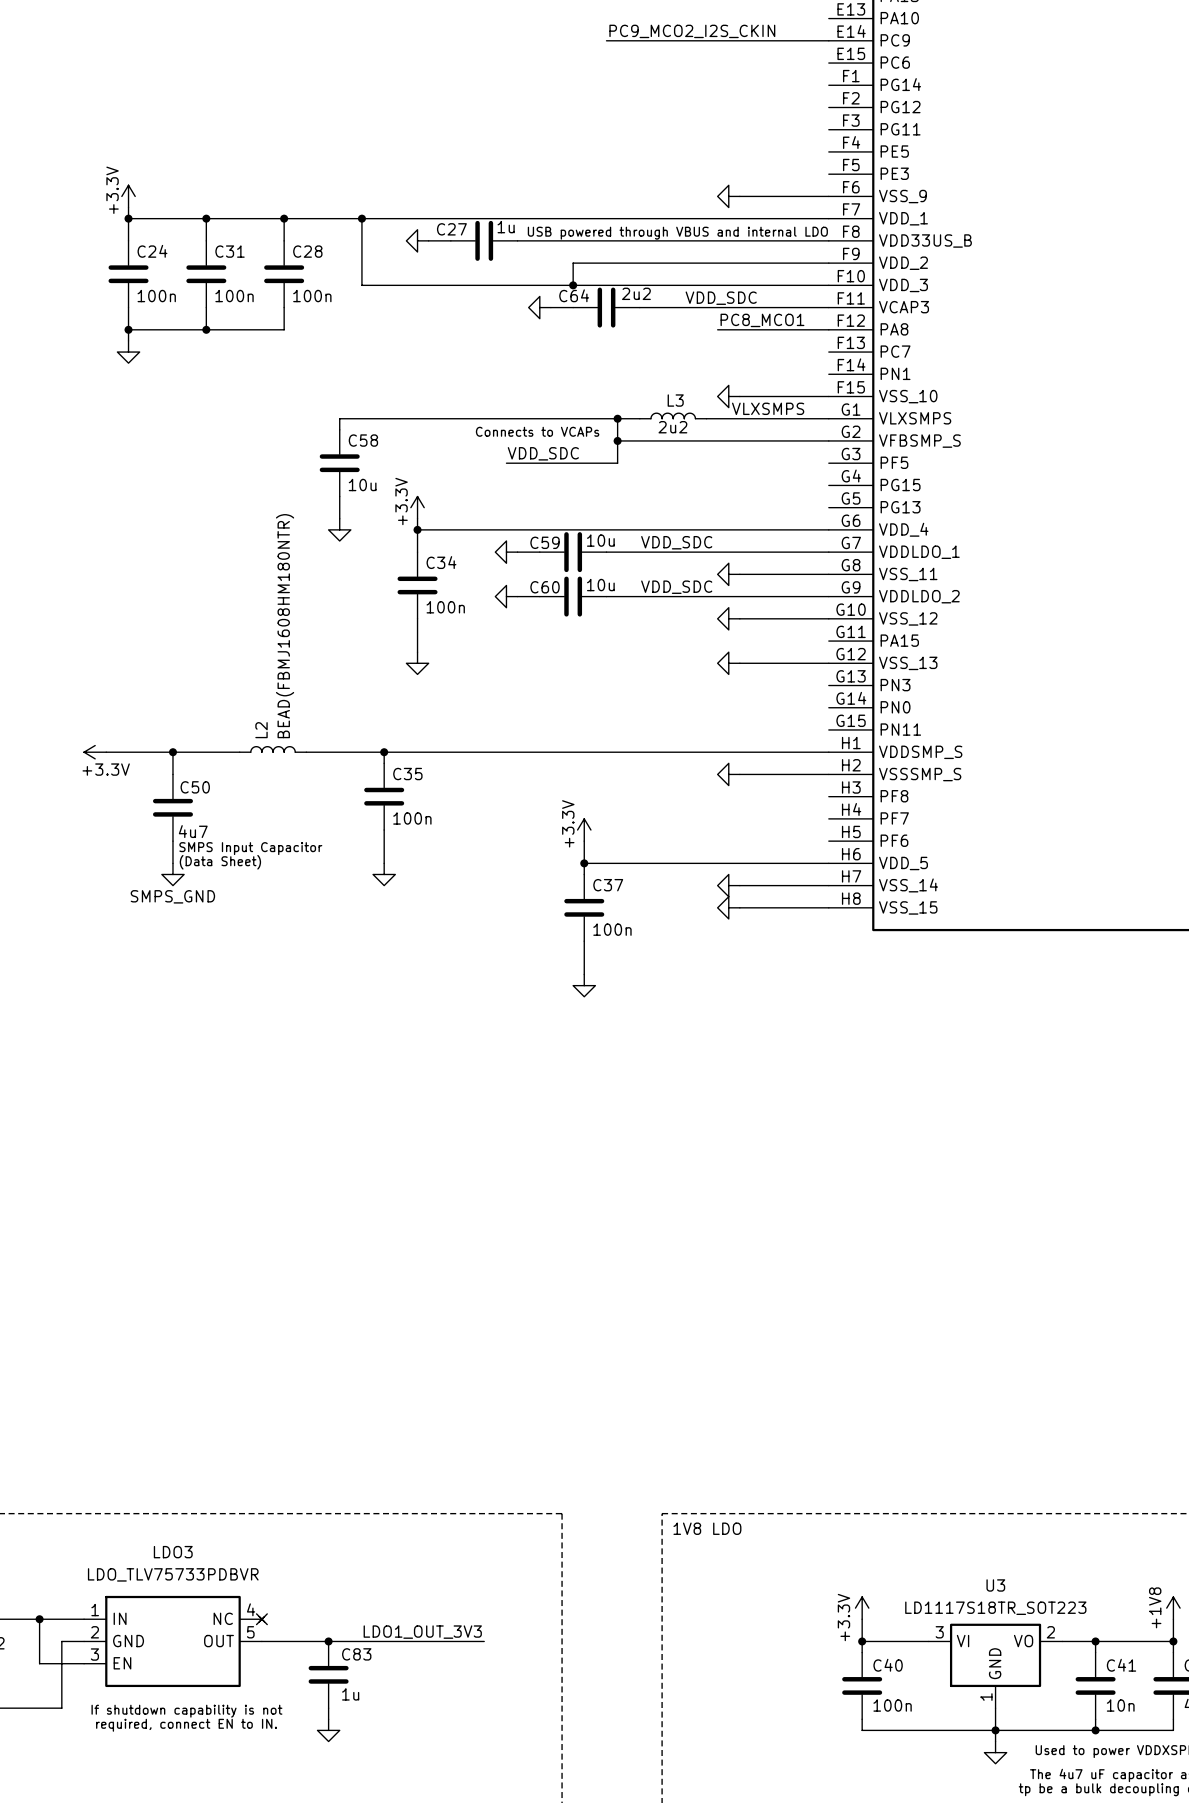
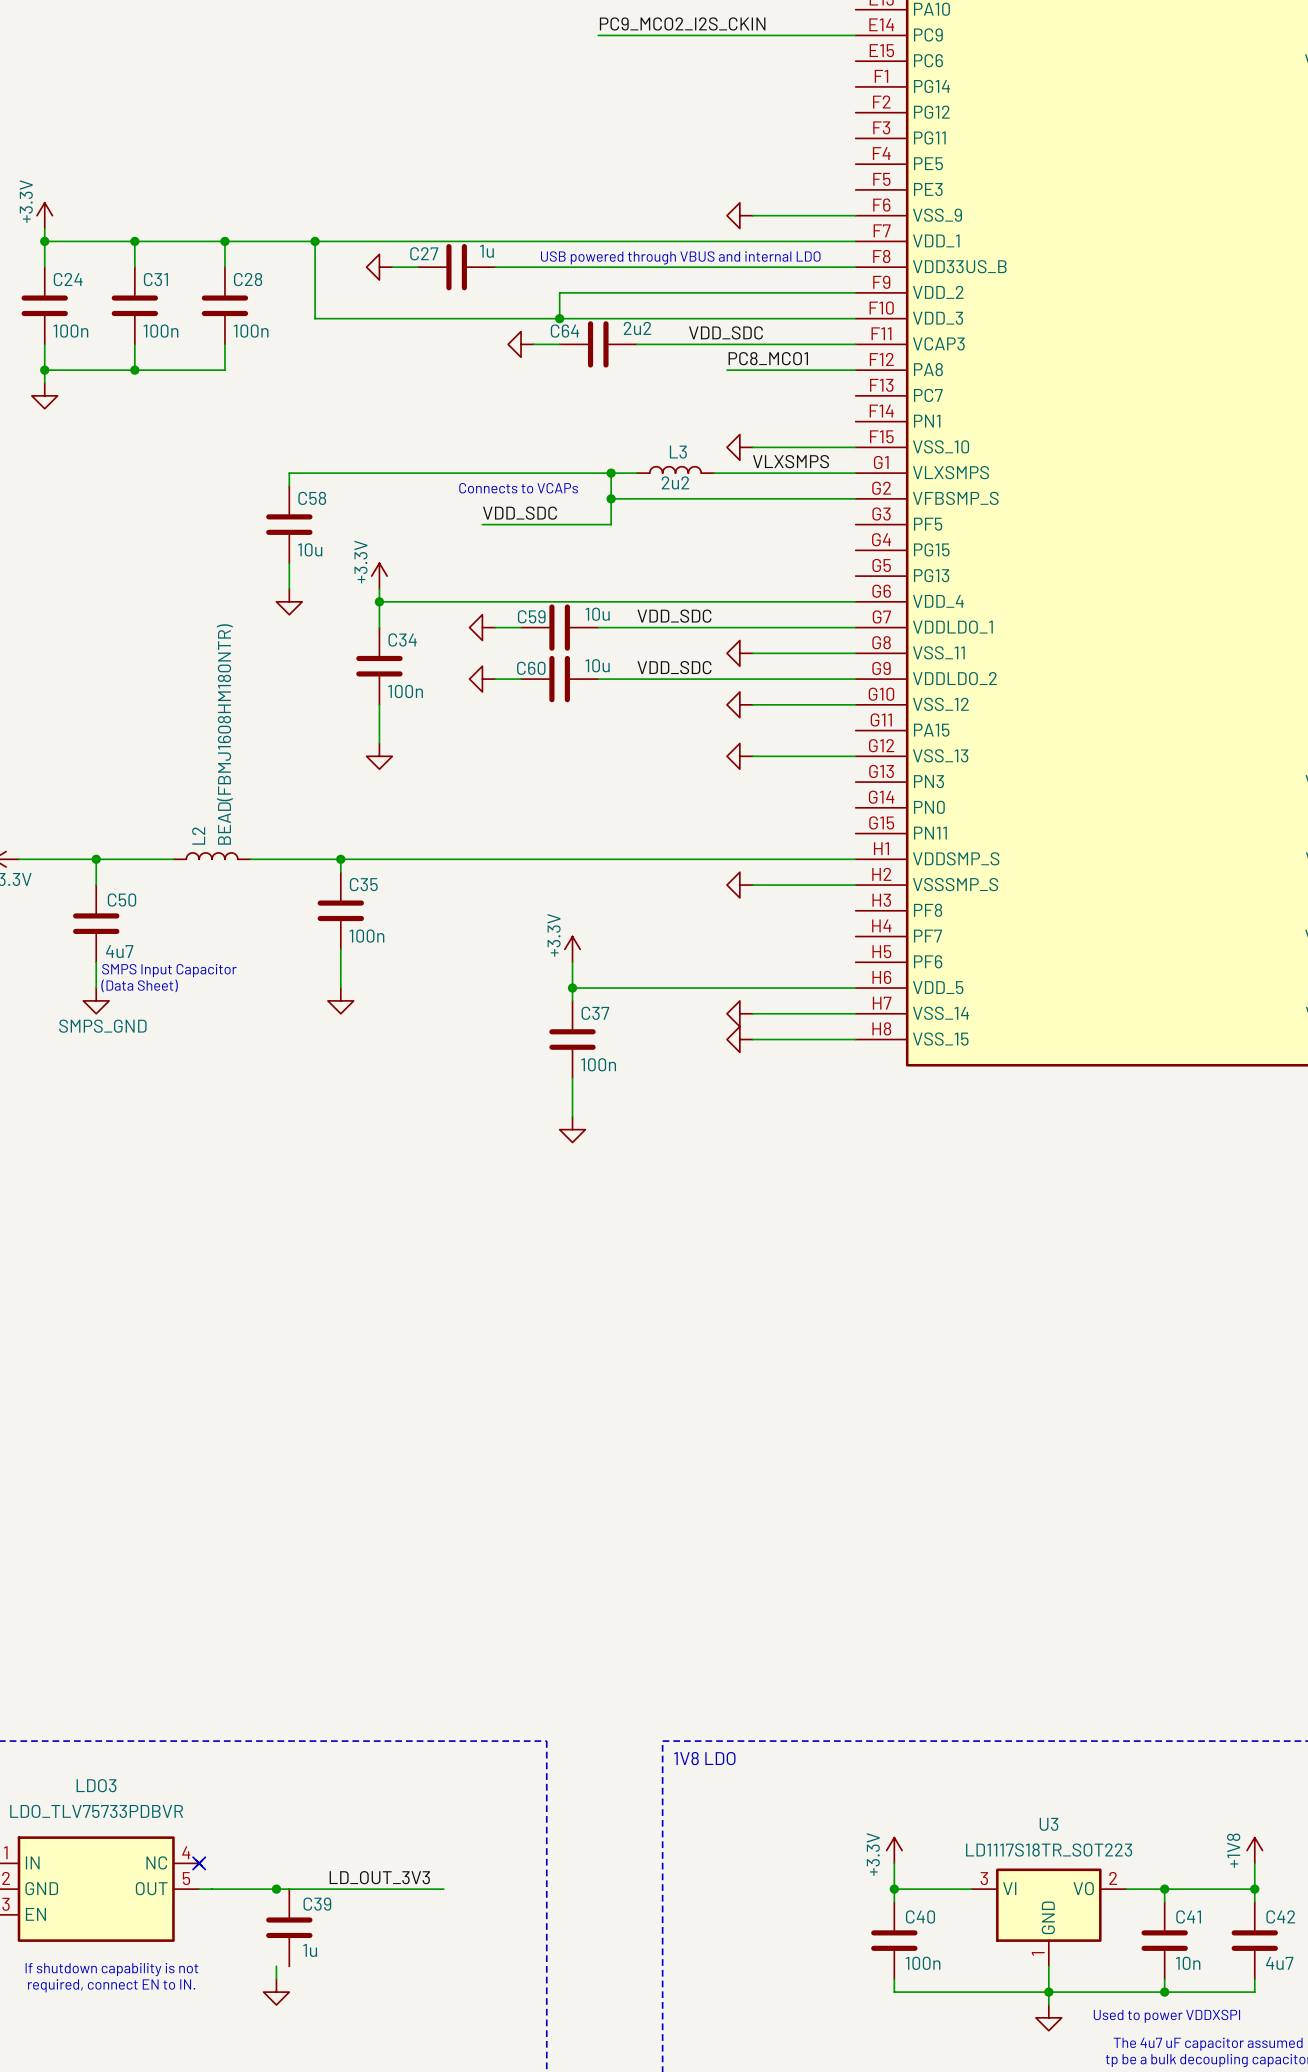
label: LDO1_OUT_3V3 (422, 1632) -> LD_OUT_3V3 (379, 1877)
wire: (473, 1641) (484, 1641) -> none
C83: 1u (328, 1674) -> none
C39: none -> 1u (289, 1927)

